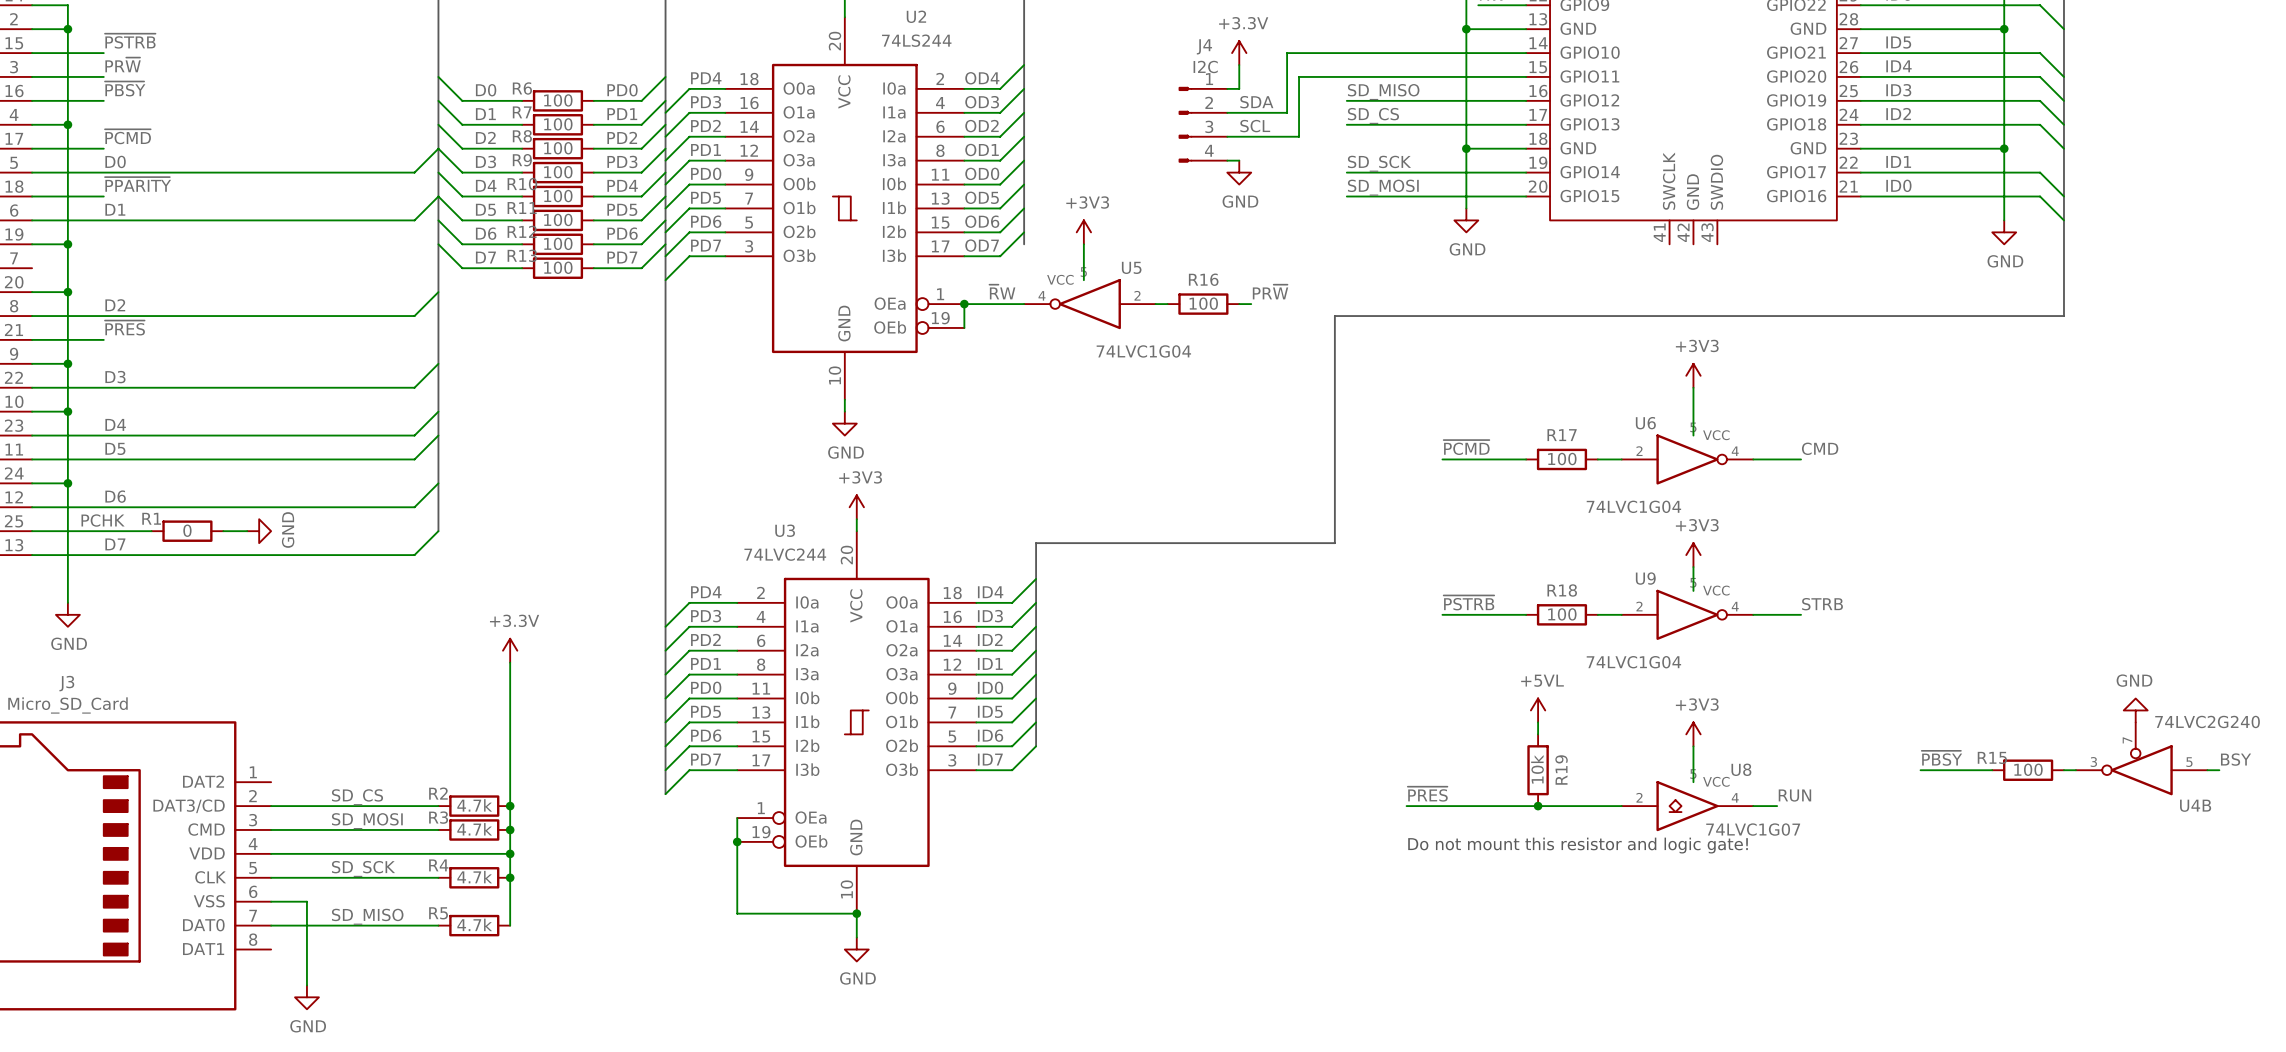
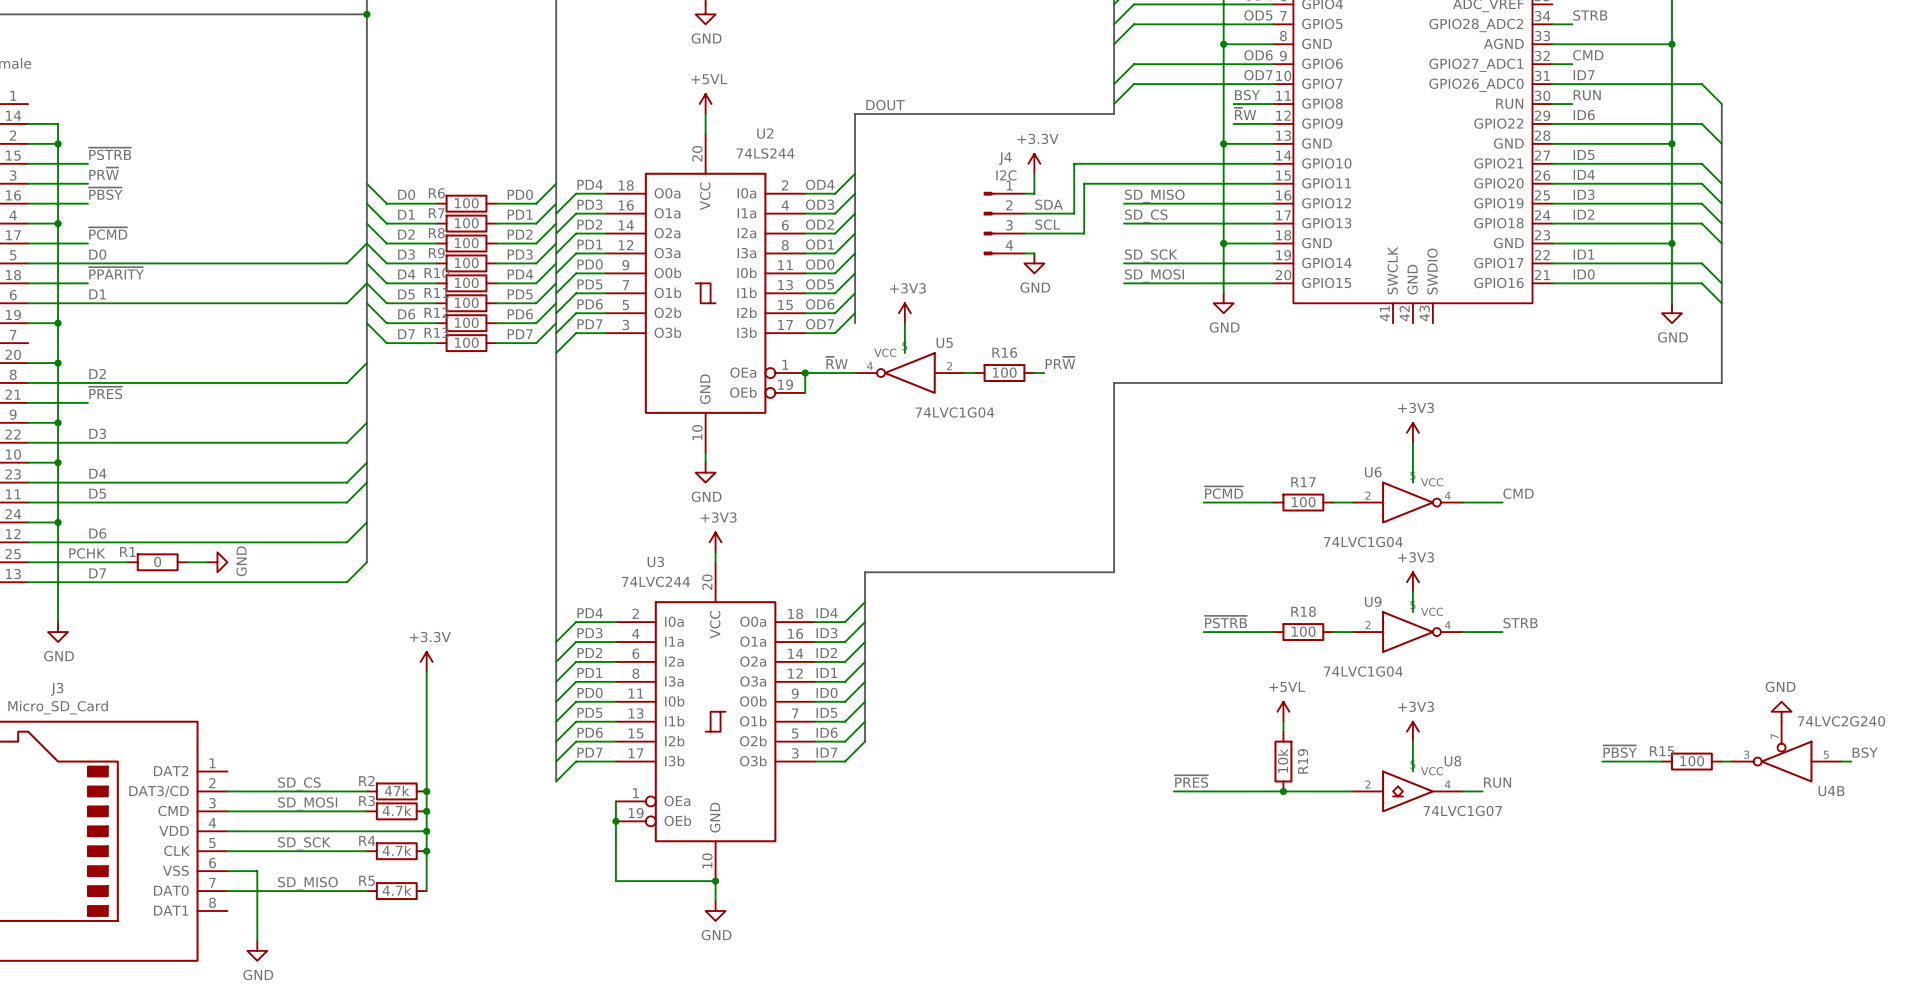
R2 value: 4.7k (474, 805) -> 47k (397, 790)
text: Do not mount this resistor and logic gate! (1578, 845) -> none

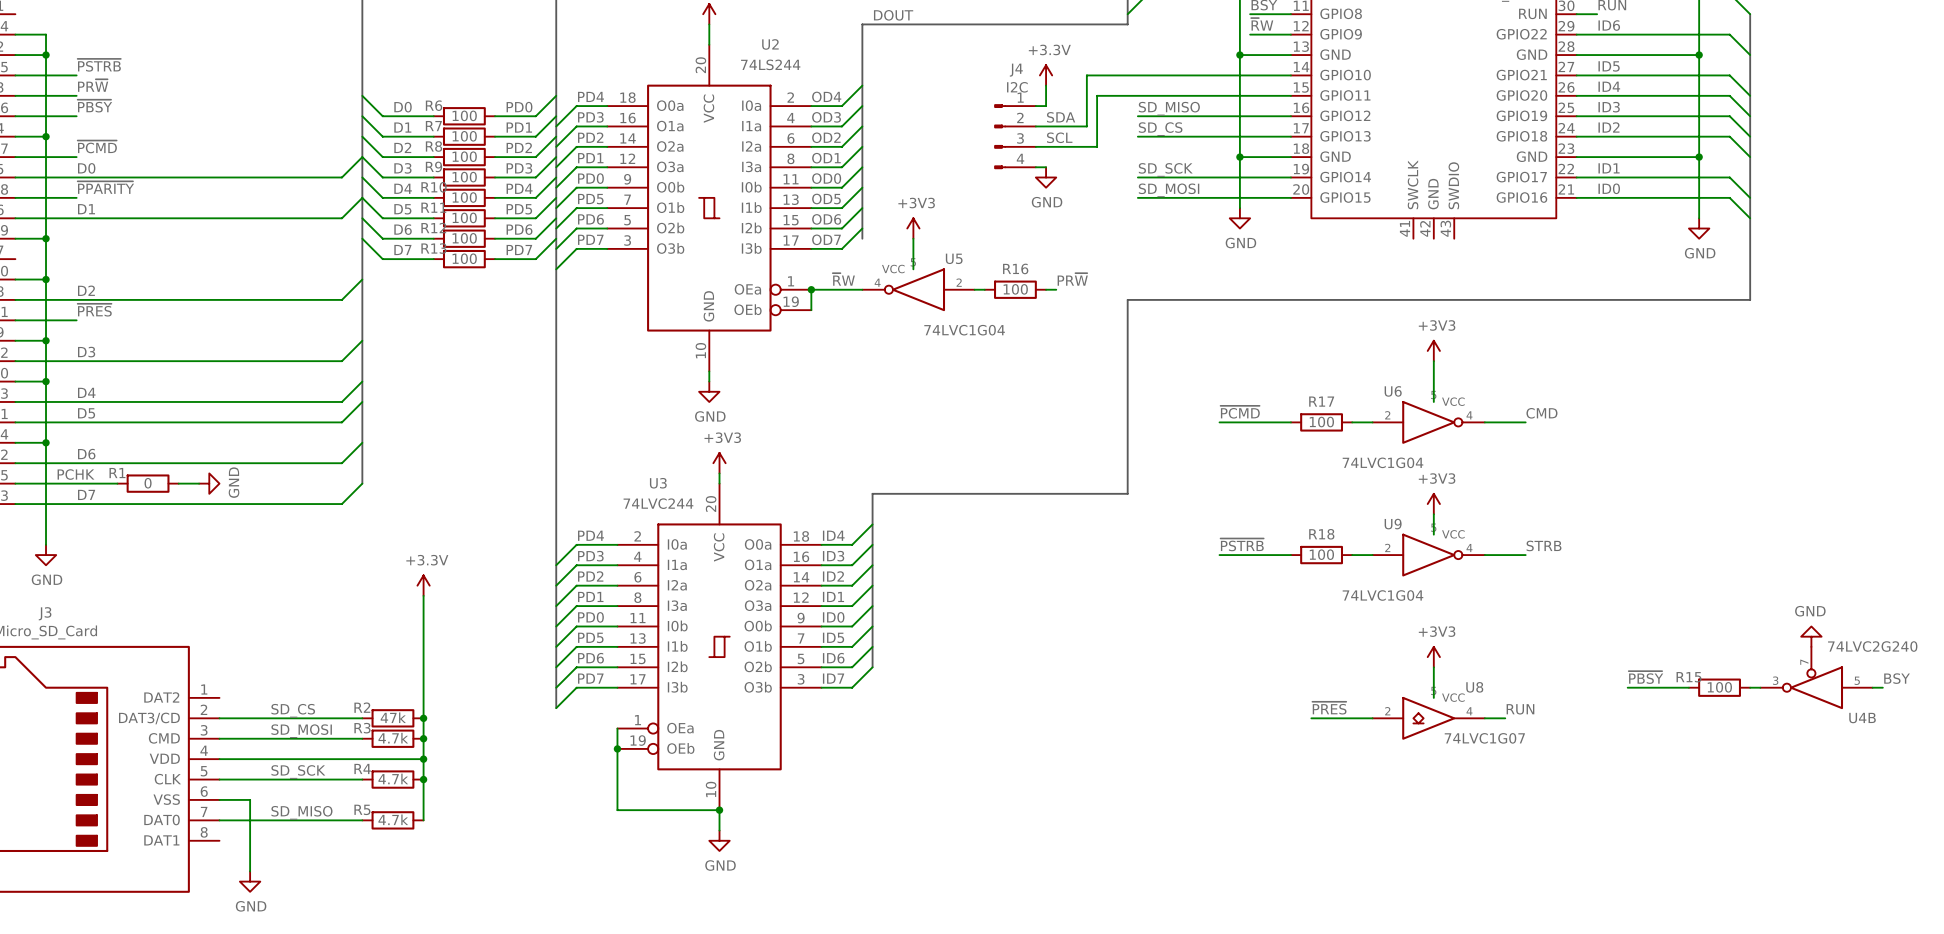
power symbol: +5VL (1283, 711) -> none
wire: (1283, 721) (1283, 731) -> none
R19: 10k (1283, 761) -> none
label position: ~{PRES} (1191, 781) -> ~{PRES} (1329, 708)
wire: (1173, 791) (1293, 791) -> none
junction: (1283, 791) -> none

